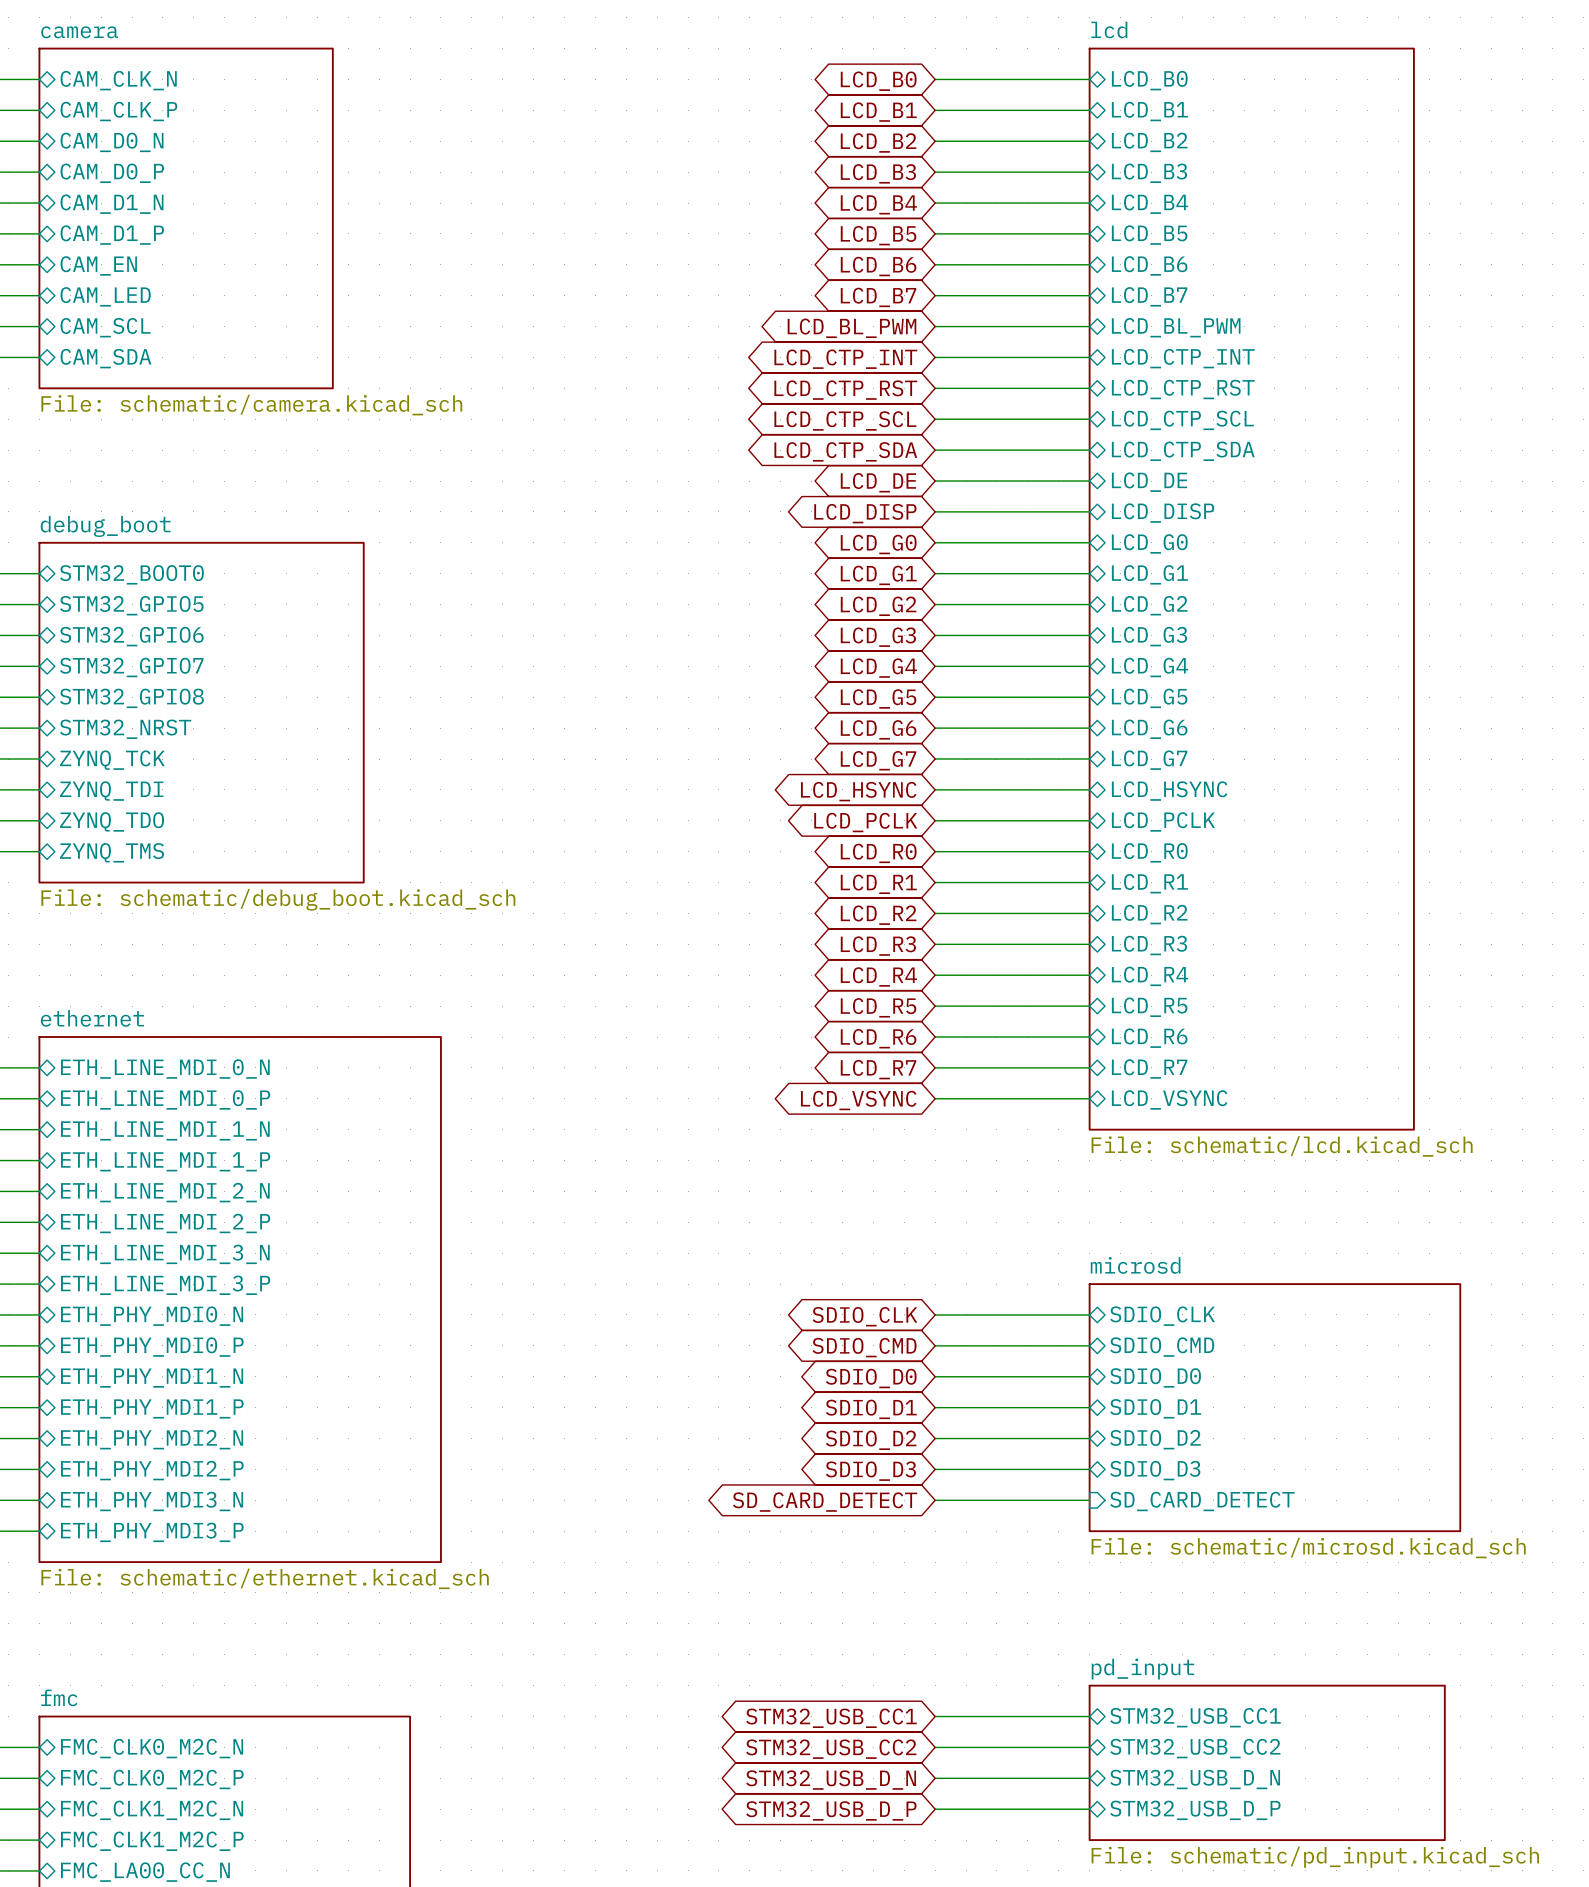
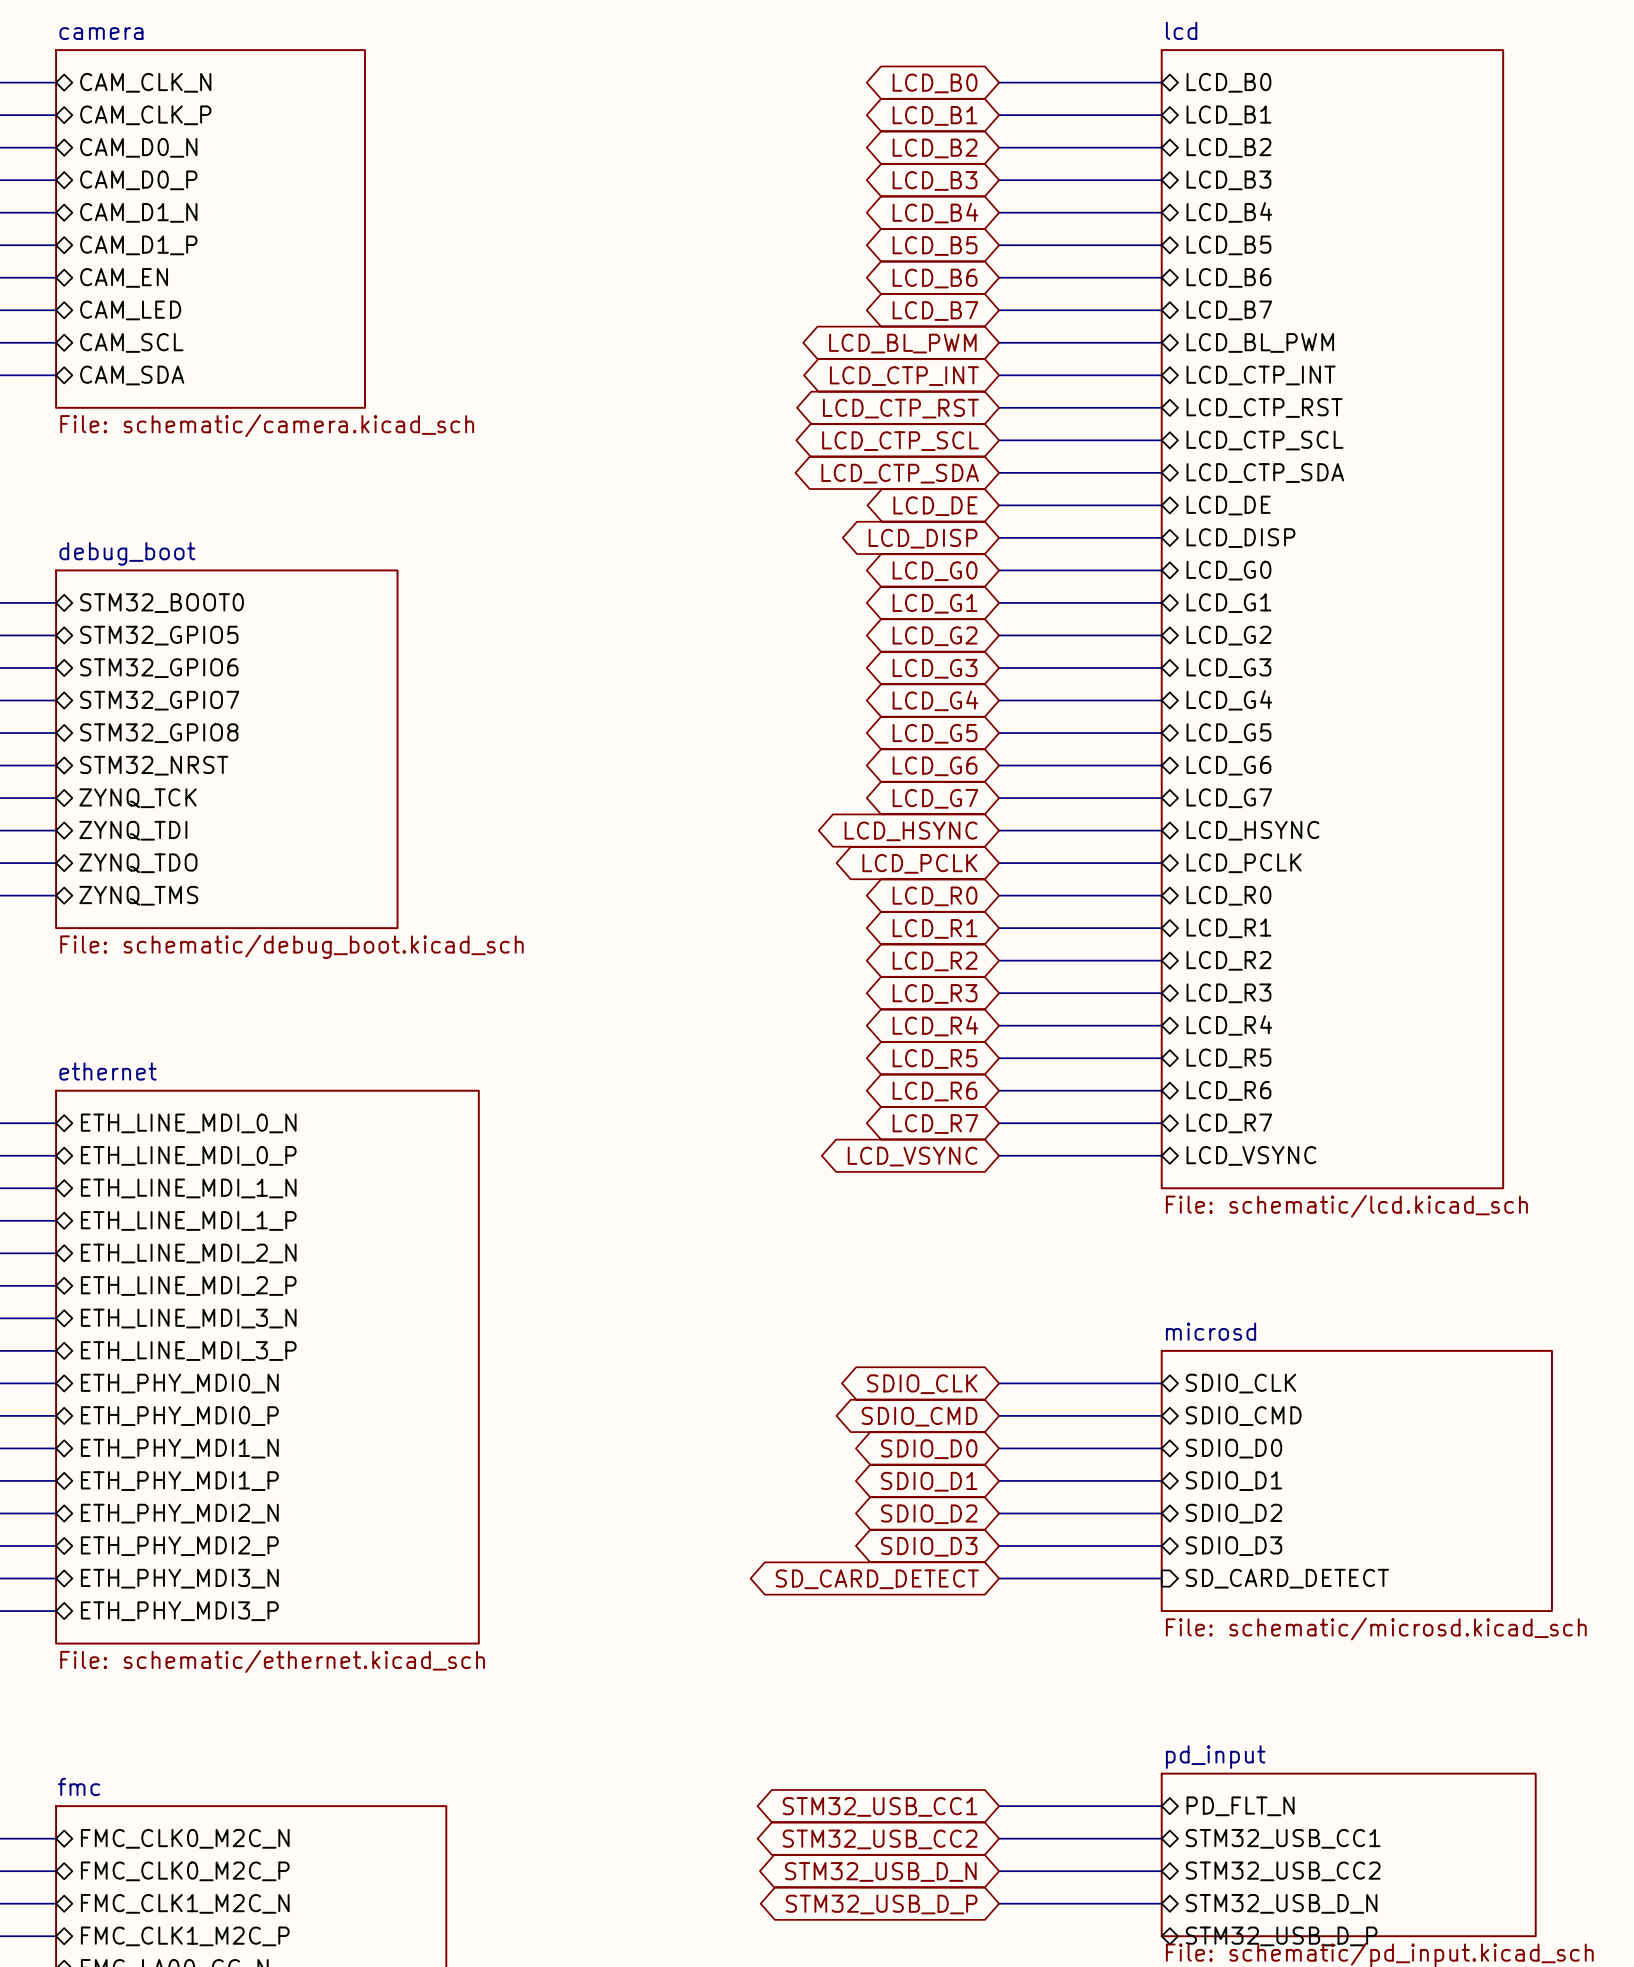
sheet pin: STM32_USB_CC1 (1195, 1717) -> PD_FLT_N (1240, 1806)
sheet pin: STM32_USB_CC2 (1195, 1748) -> STM32_USB_CC1 (1283, 1838)
sheet pin: STM32_USB_D_N (1195, 1779) -> STM32_USB_CC2 (1283, 1871)
sheet pin: STM32_USB_D_P (1195, 1810) -> STM32_USB_D_N (1281, 1903)
sheet pin: none -> STM32_USB_D_P (1281, 1936)

